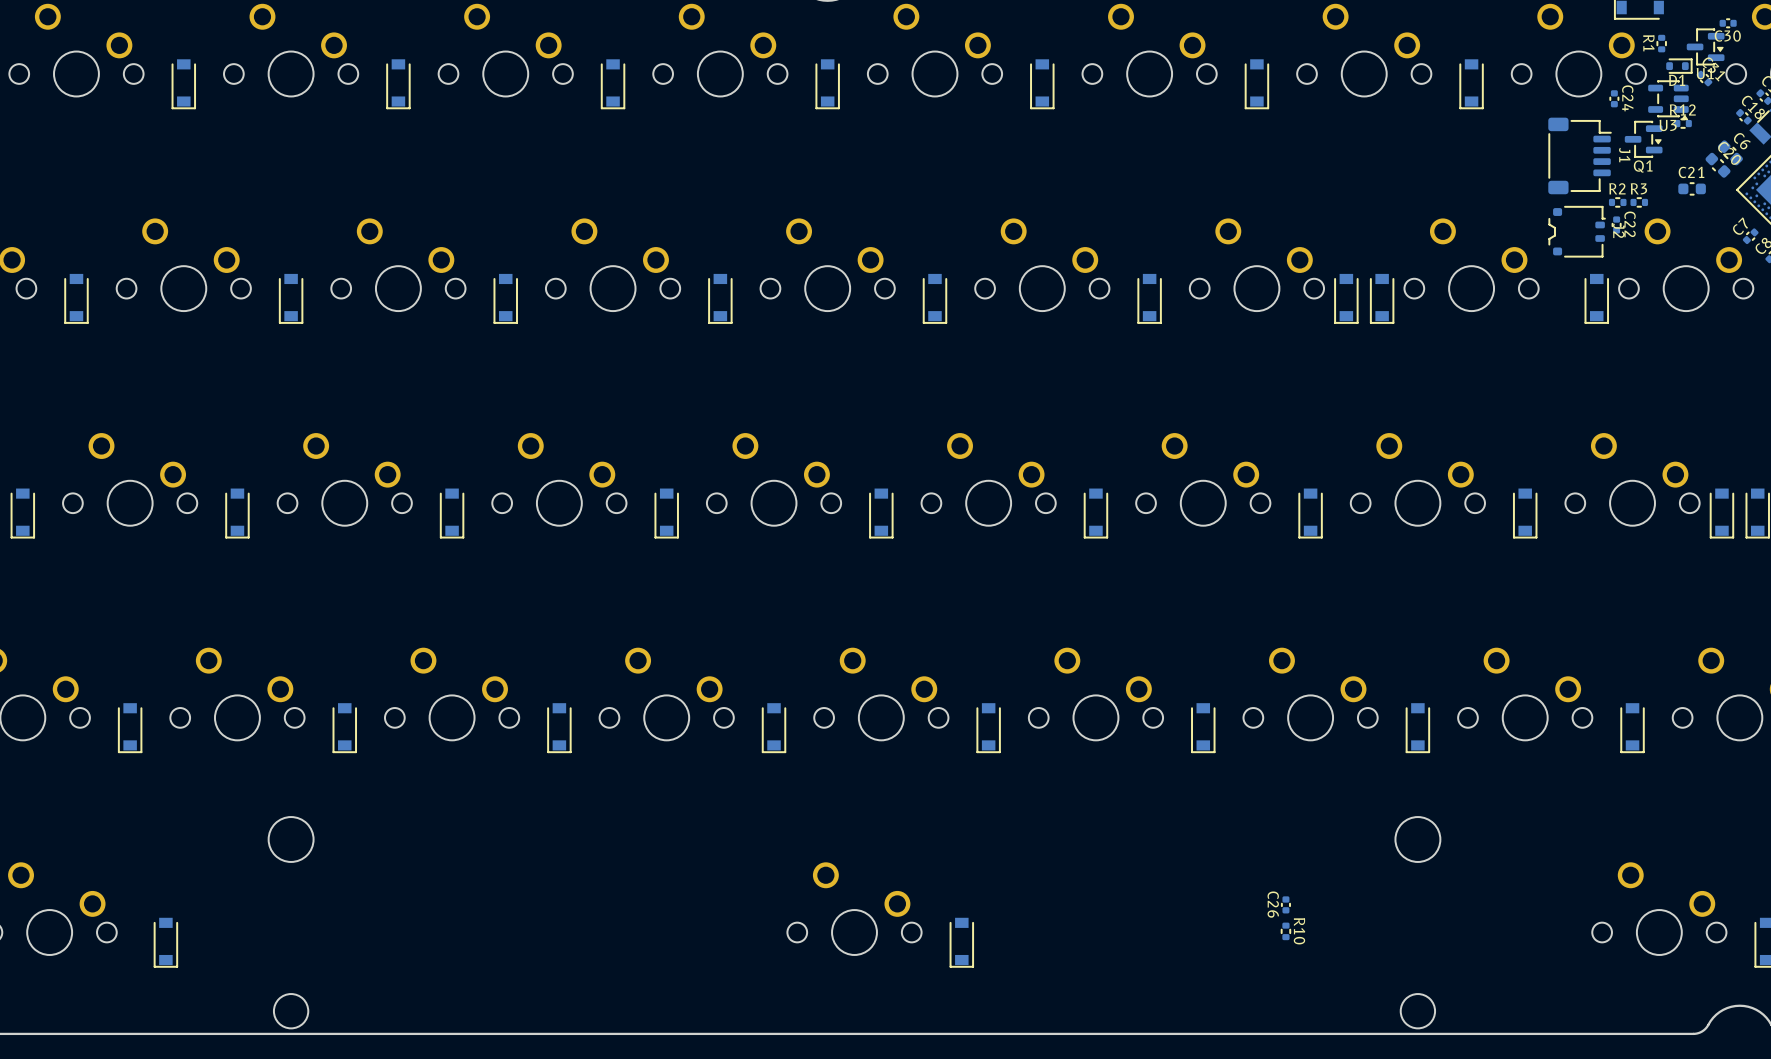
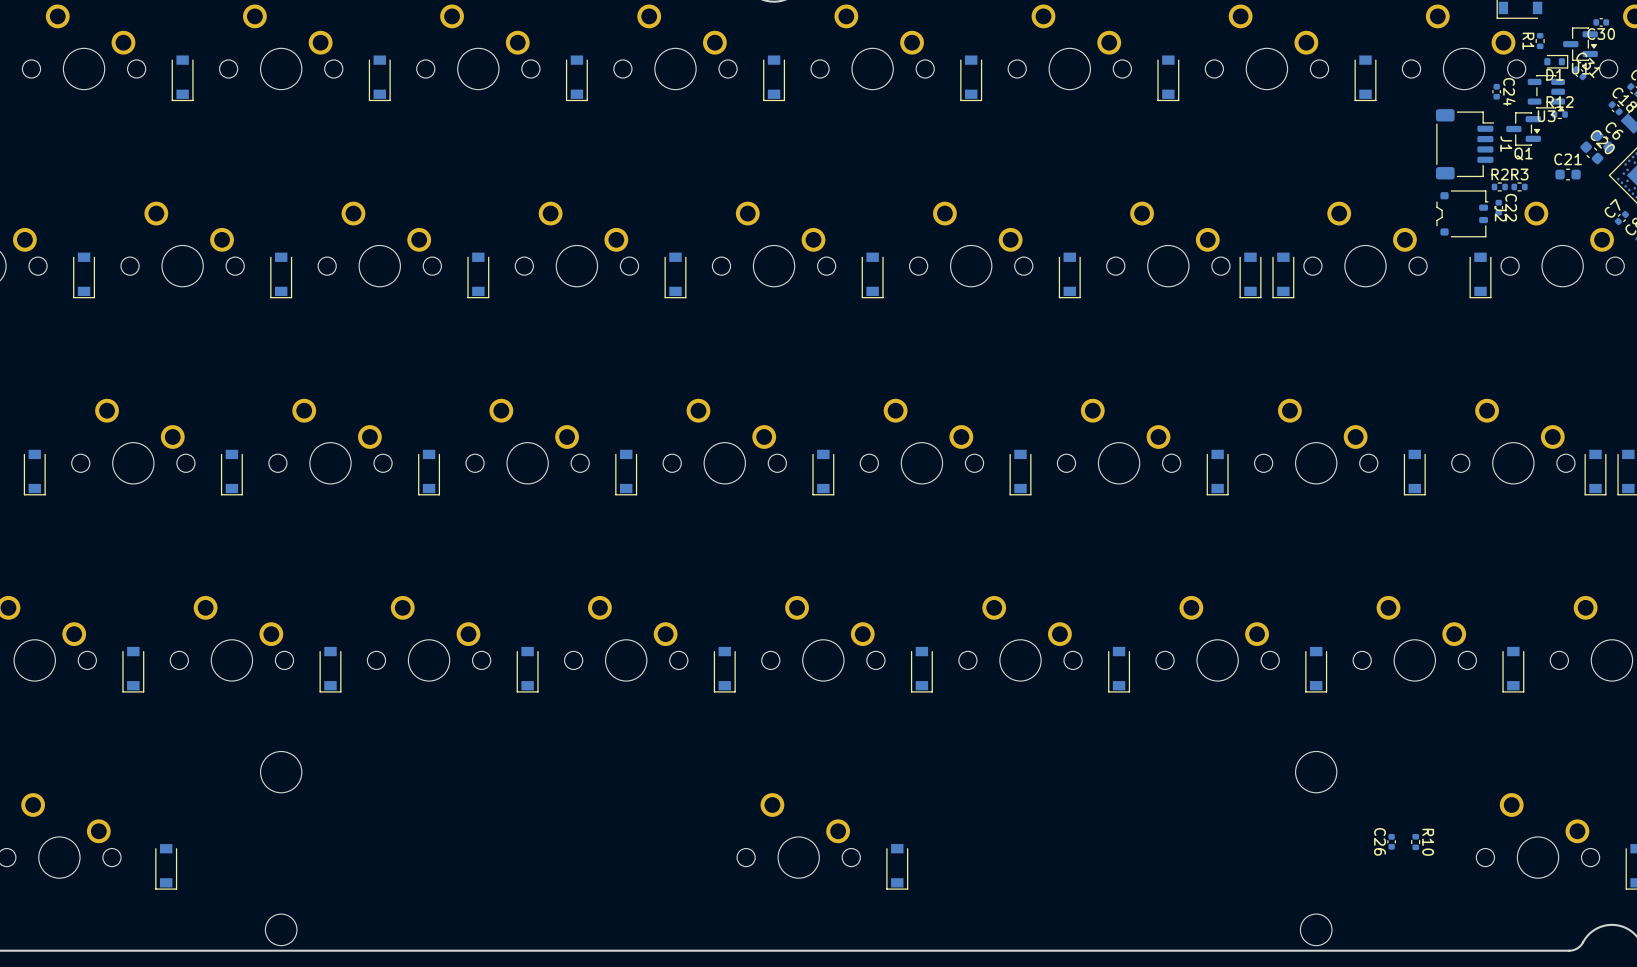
C26 position: (1285, 904) -> (1391, 841)
R10 position: (1285, 931) -> (1415, 842)

